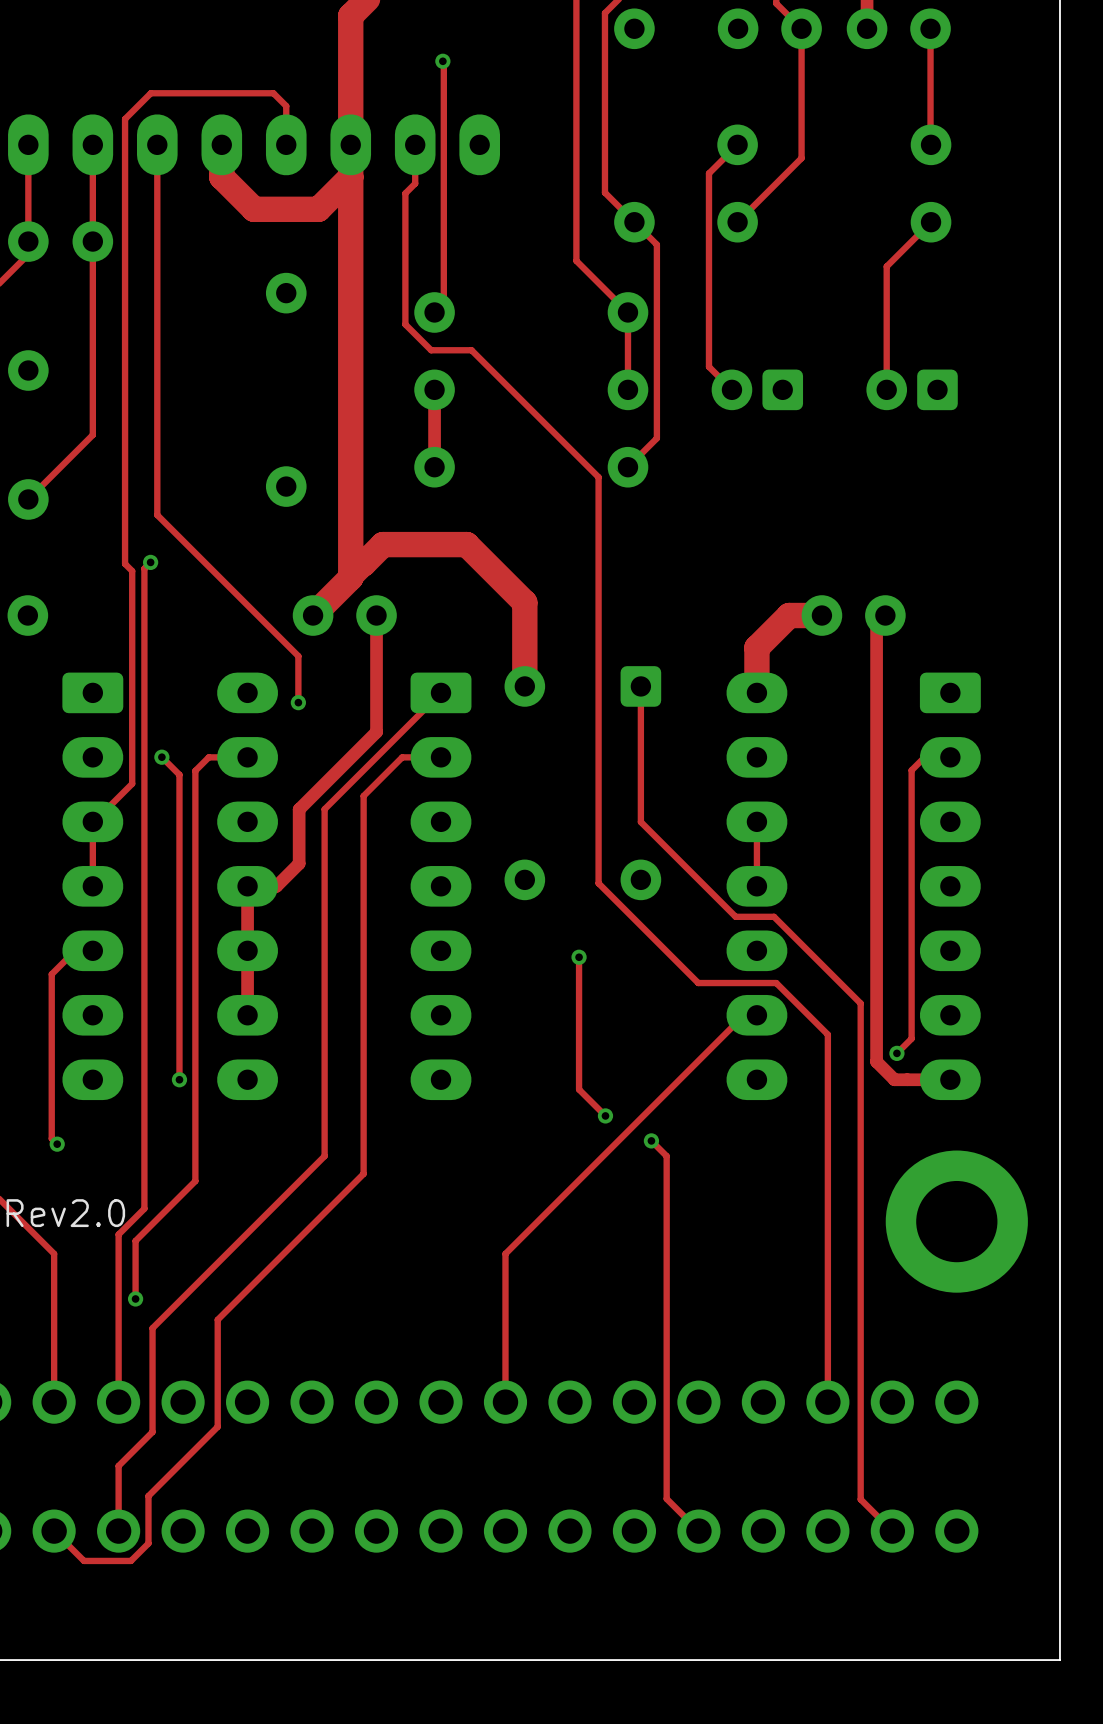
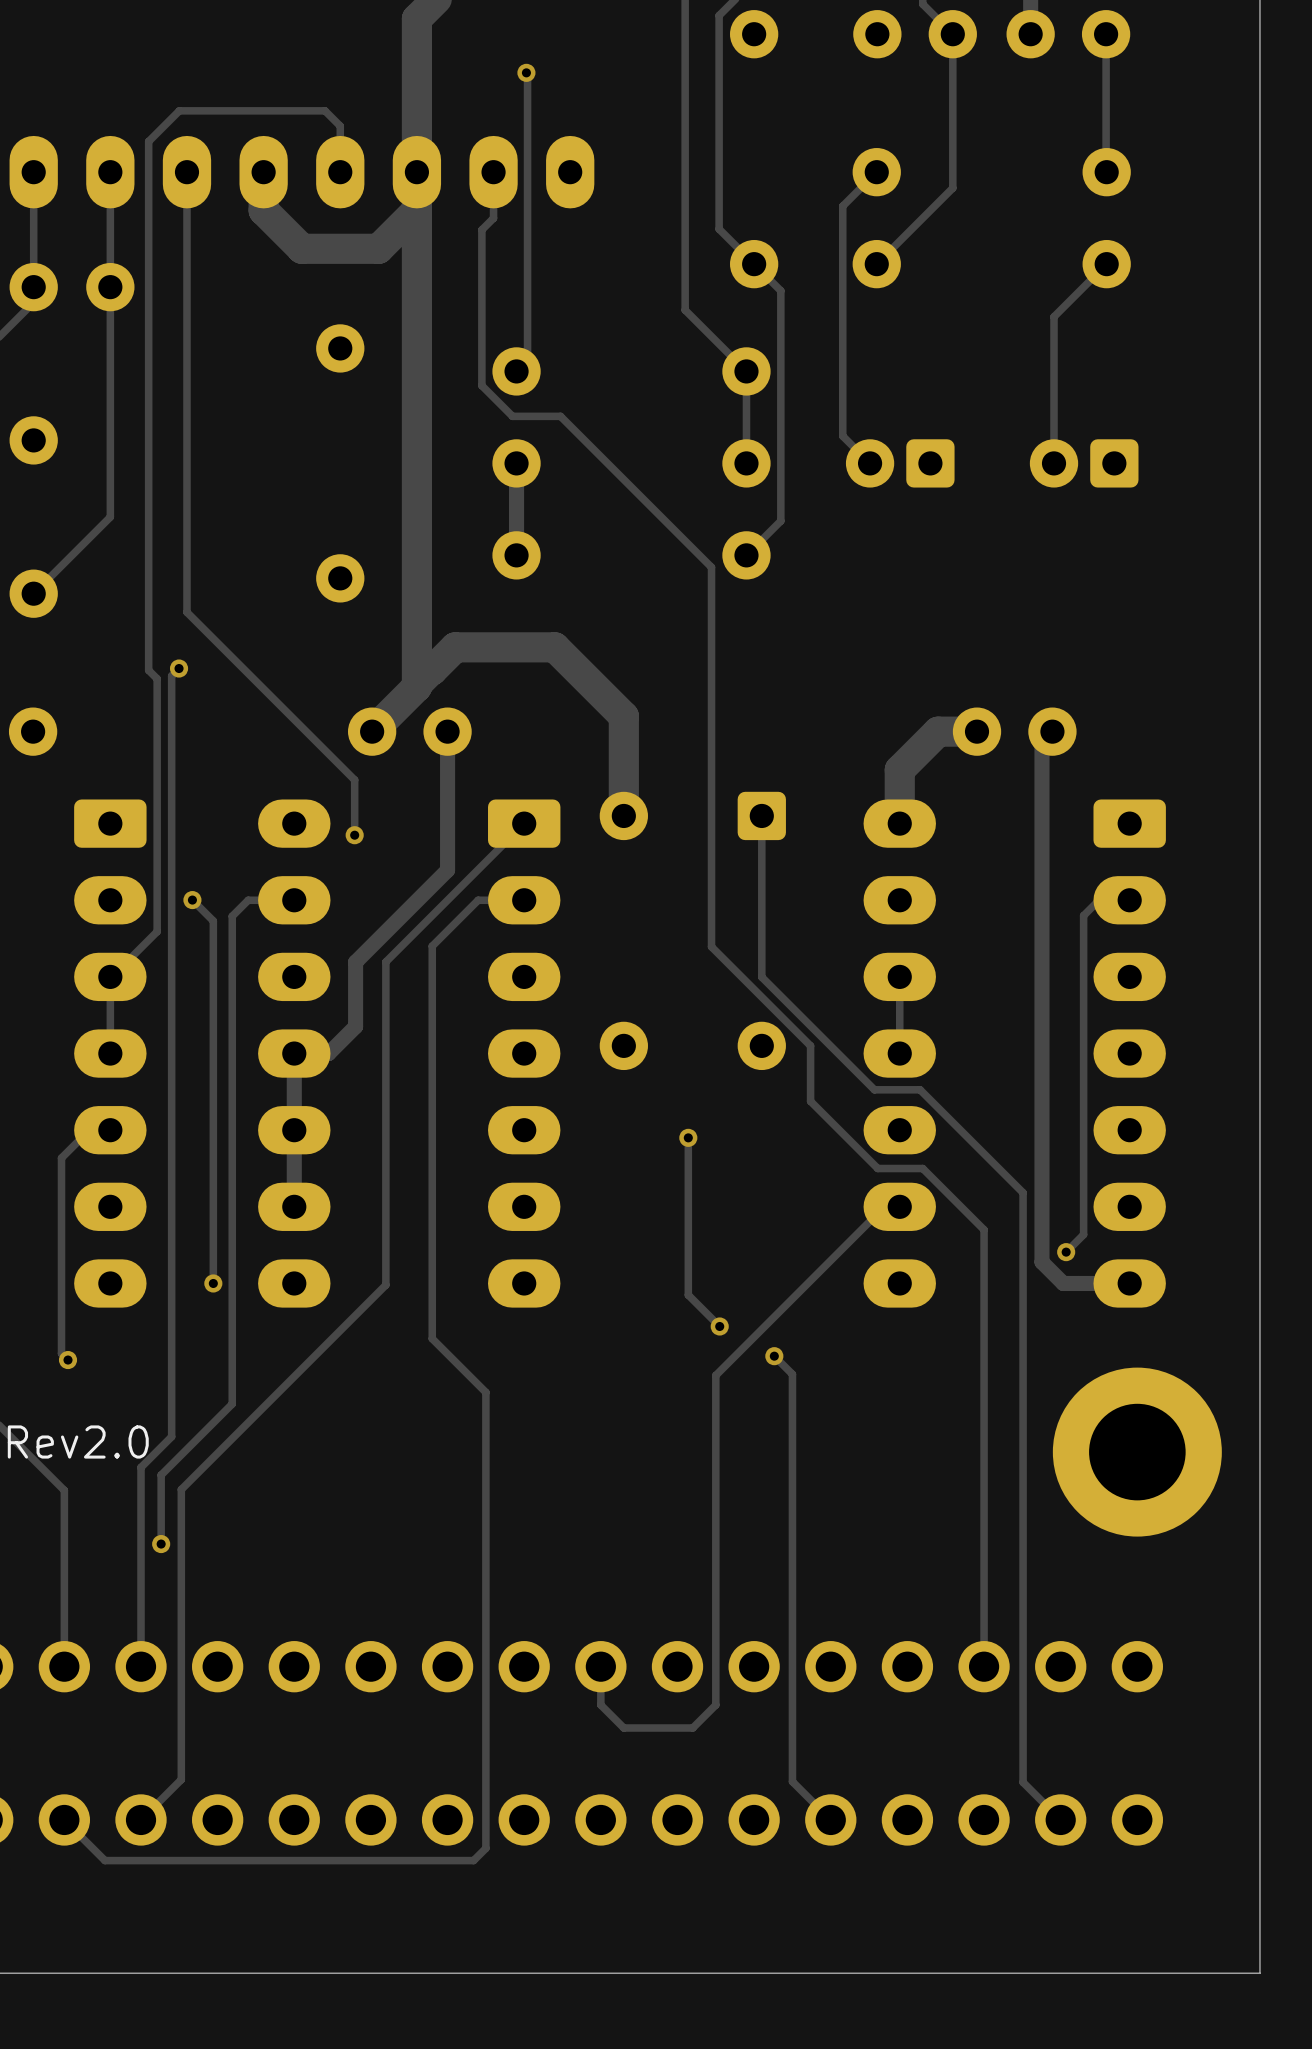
track: (598, 796) (598, 883) (698, 983) (738, 983) -> (711, 946) (810, 1045) (810, 1101) (877, 1168)
track: (324, 1081) (324, 1156) (152, 1328) -> (385, 1285) (181, 1489) (181, 1578)
track: (363, 1126) (363, 1173) (217, 1319) (217, 1426) (148, 1496) (148, 1543) (130, 1560) (83, 1560) -> (432, 1338) (485, 1392) (485, 1848) (473, 1860) (104, 1860) (99, 1855)
track: (602, 1157) (505, 1253) (505, 1402) -> (715, 1375) (715, 1705) (692, 1728) (623, 1728) (600, 1705) (600, 1666)
track: (152, 1432) (118, 1465) (118, 1531) -> (181, 1702) (181, 1779) (141, 1819)

